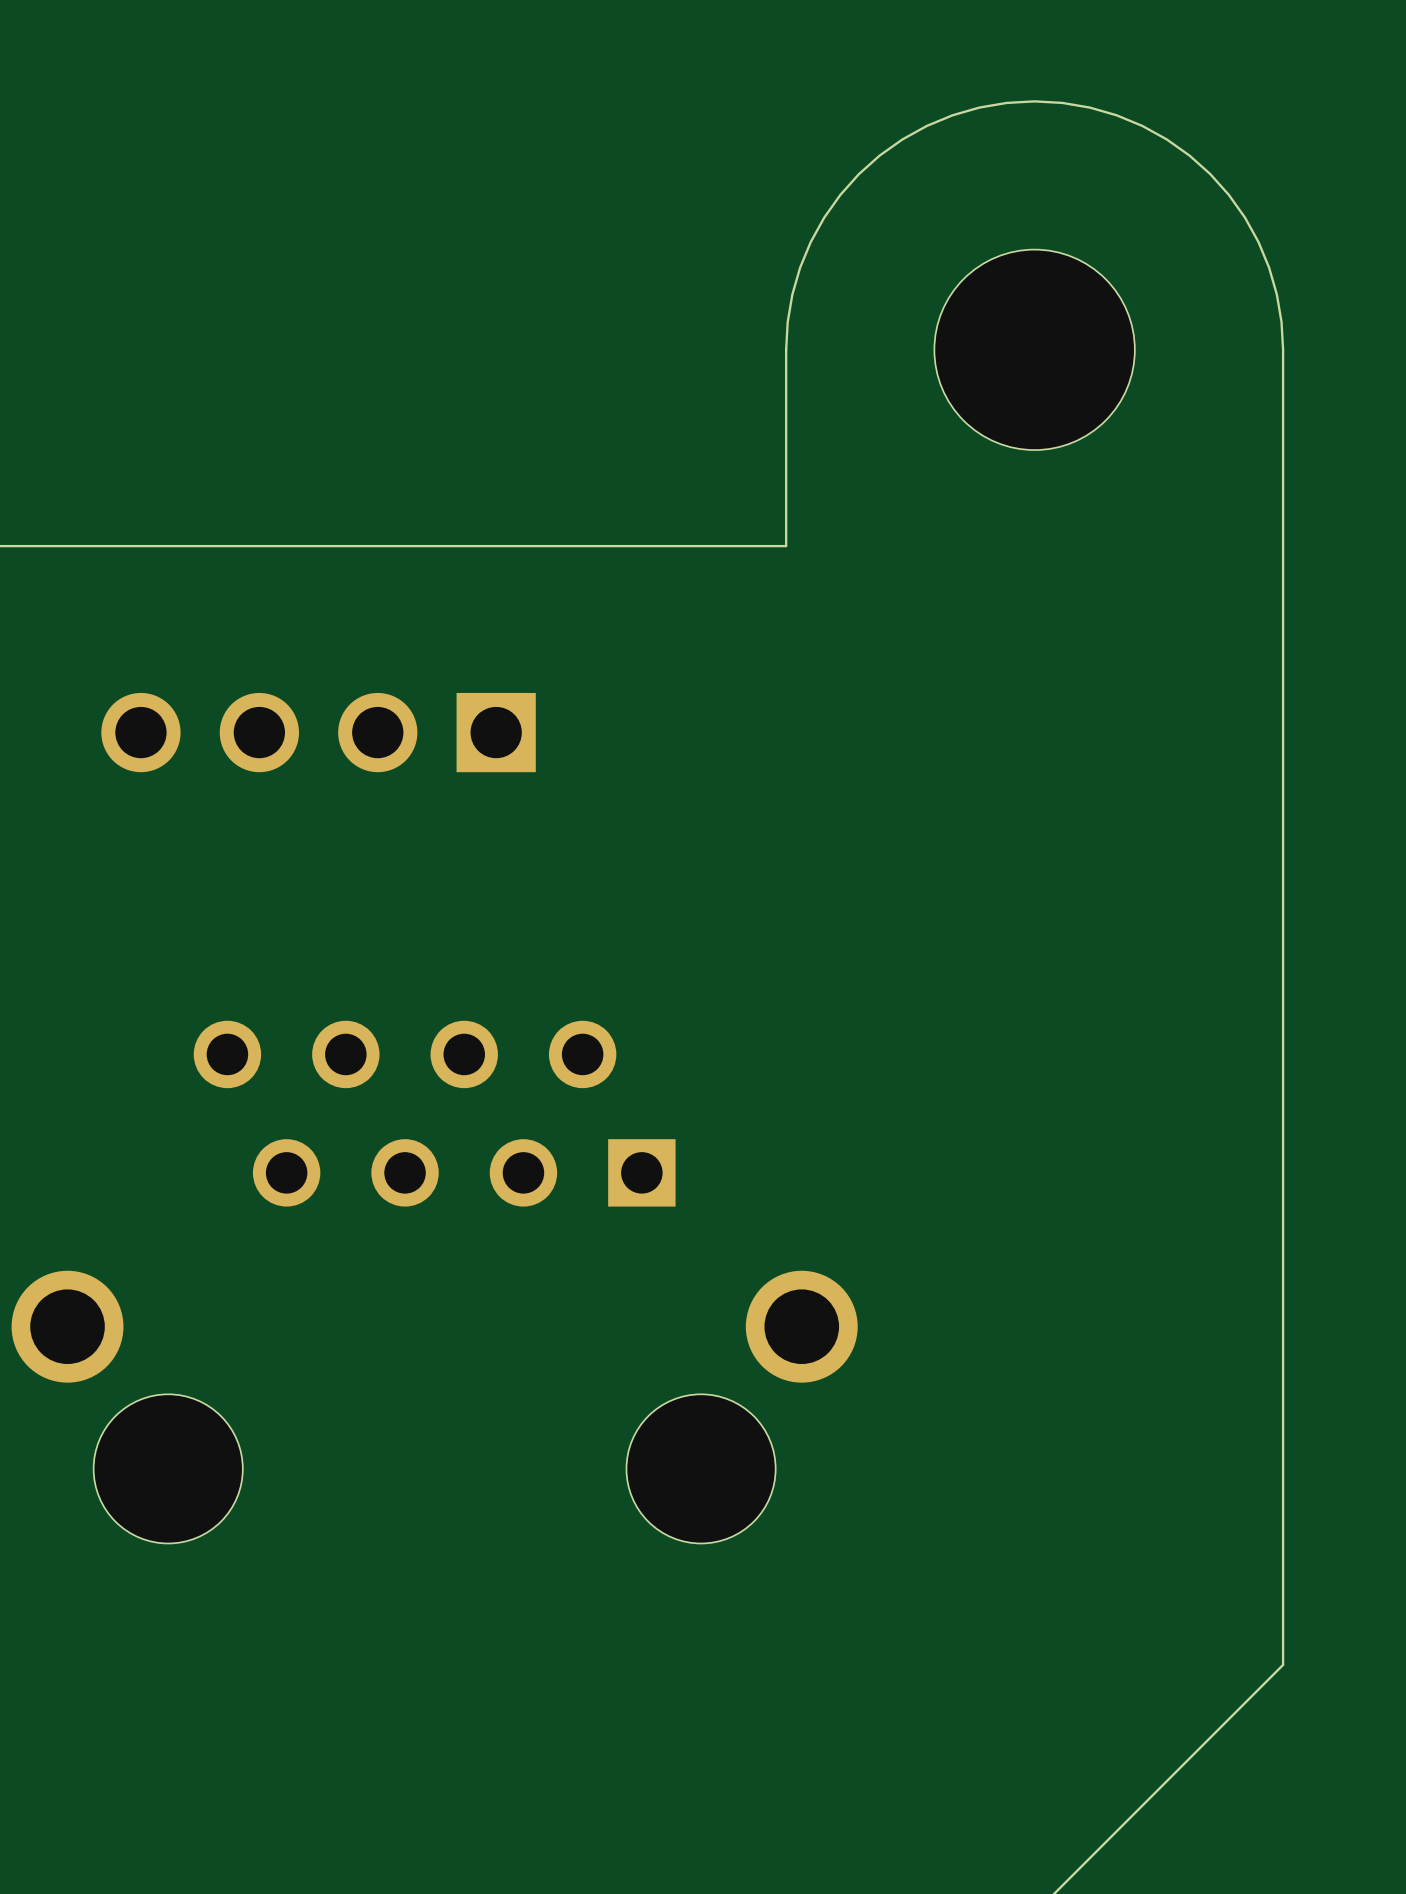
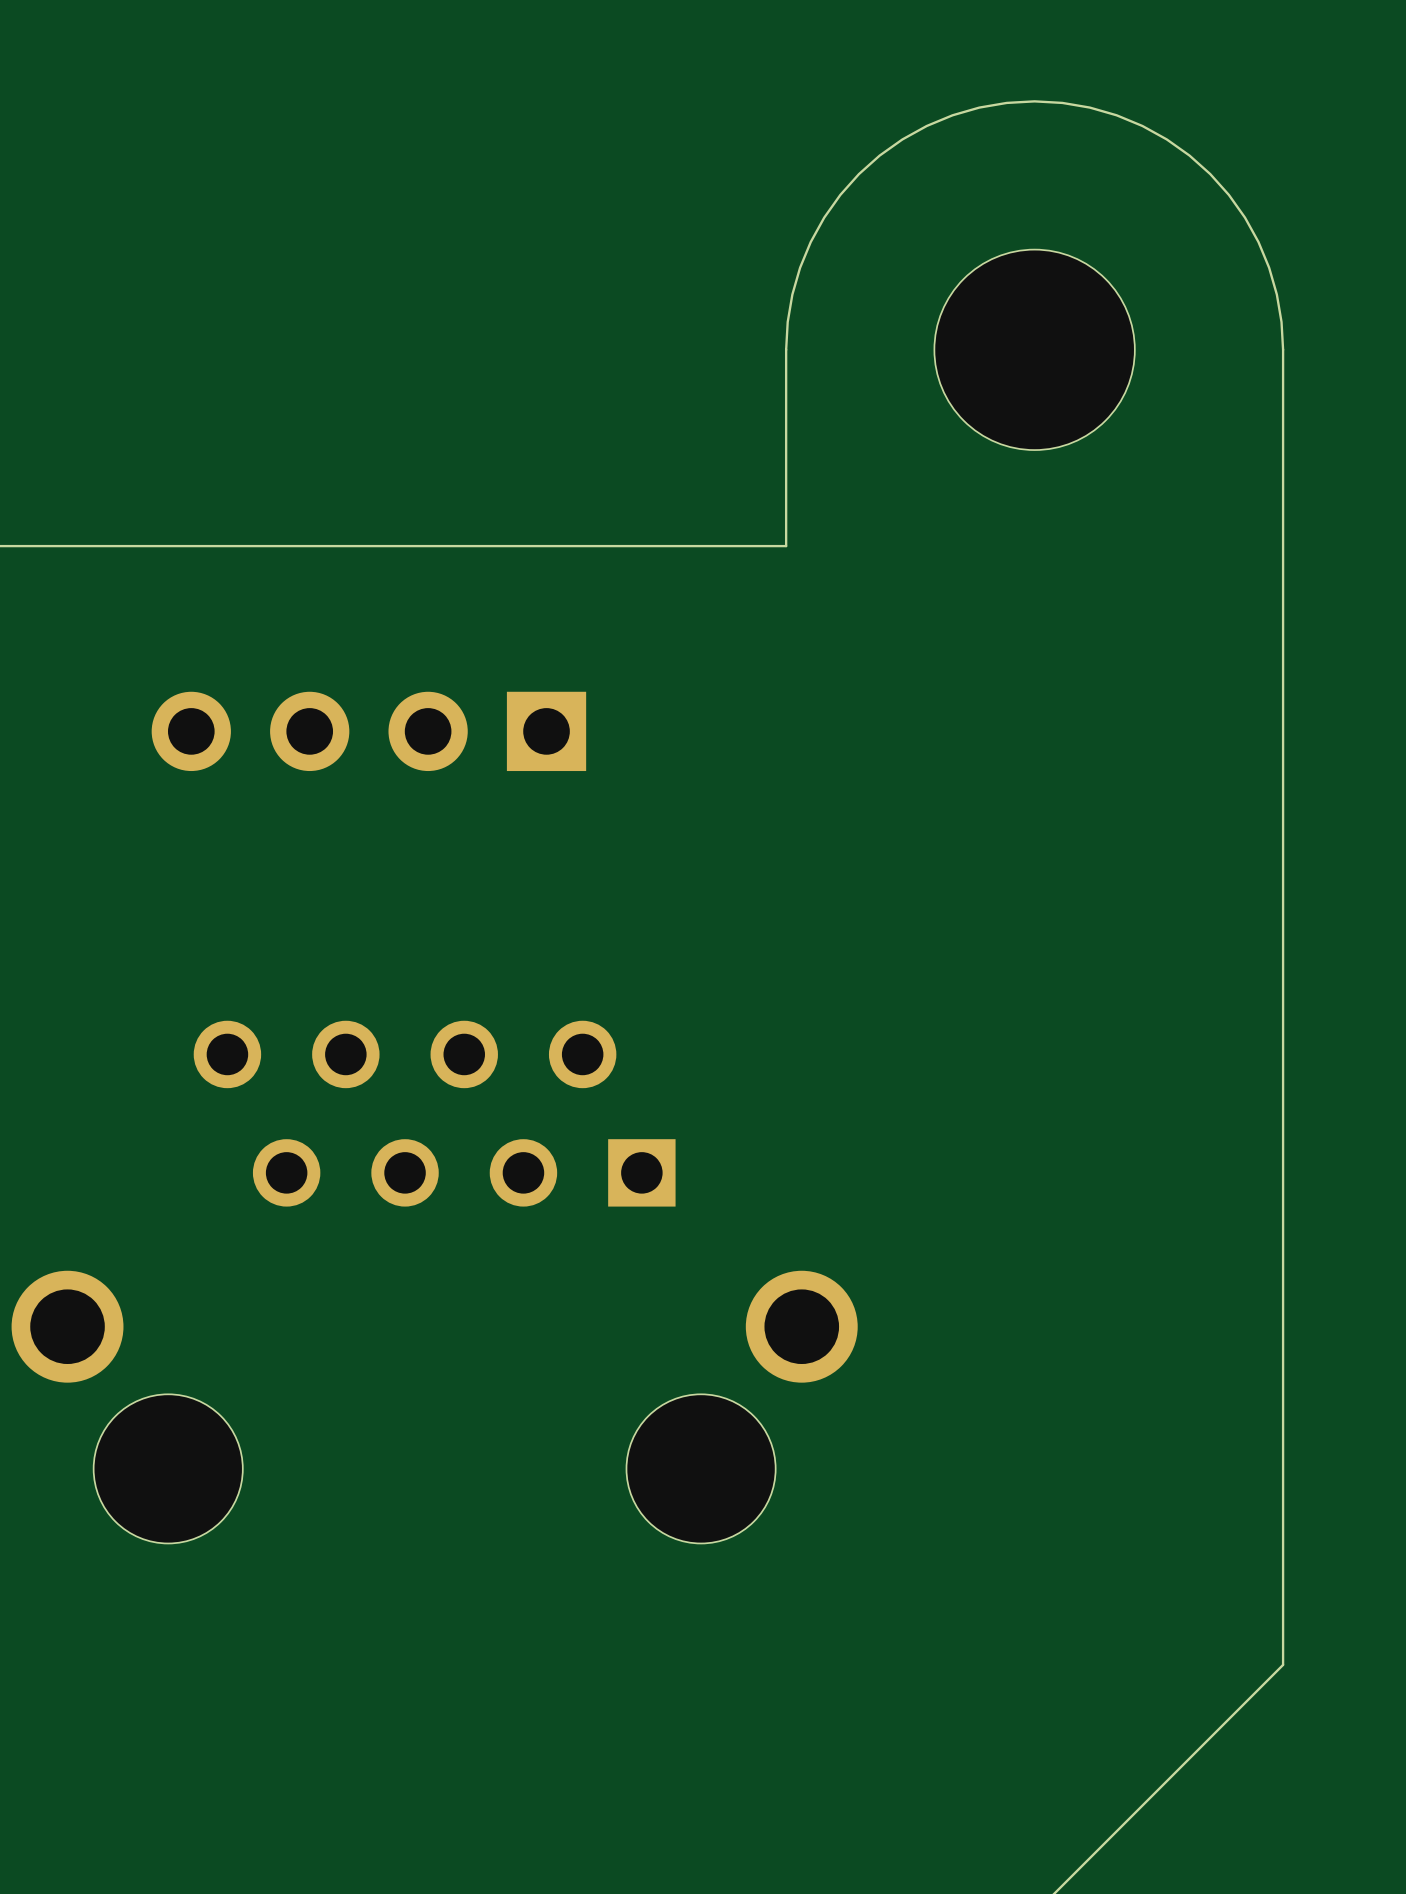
part: none -> (368, 731)
part: (318, 732) -> none

